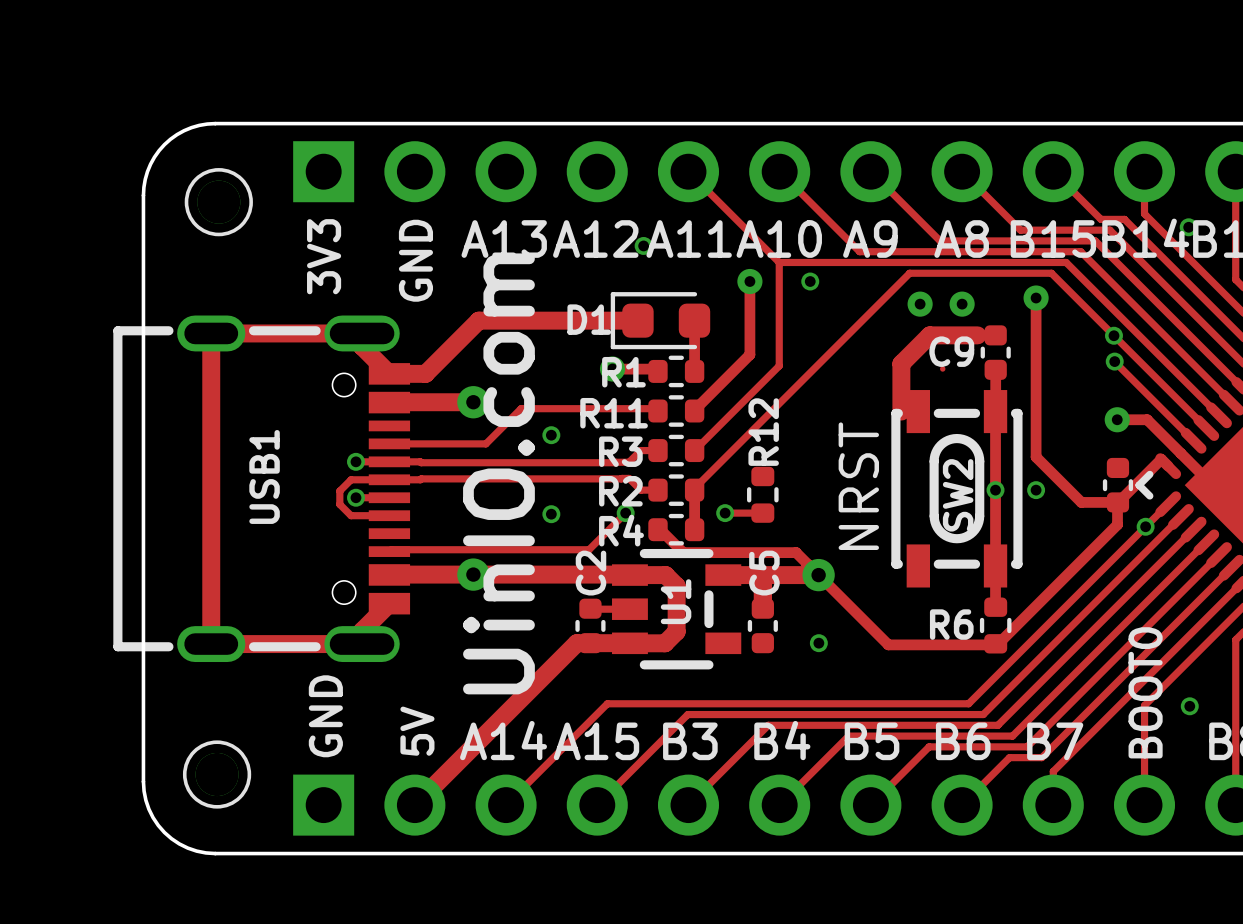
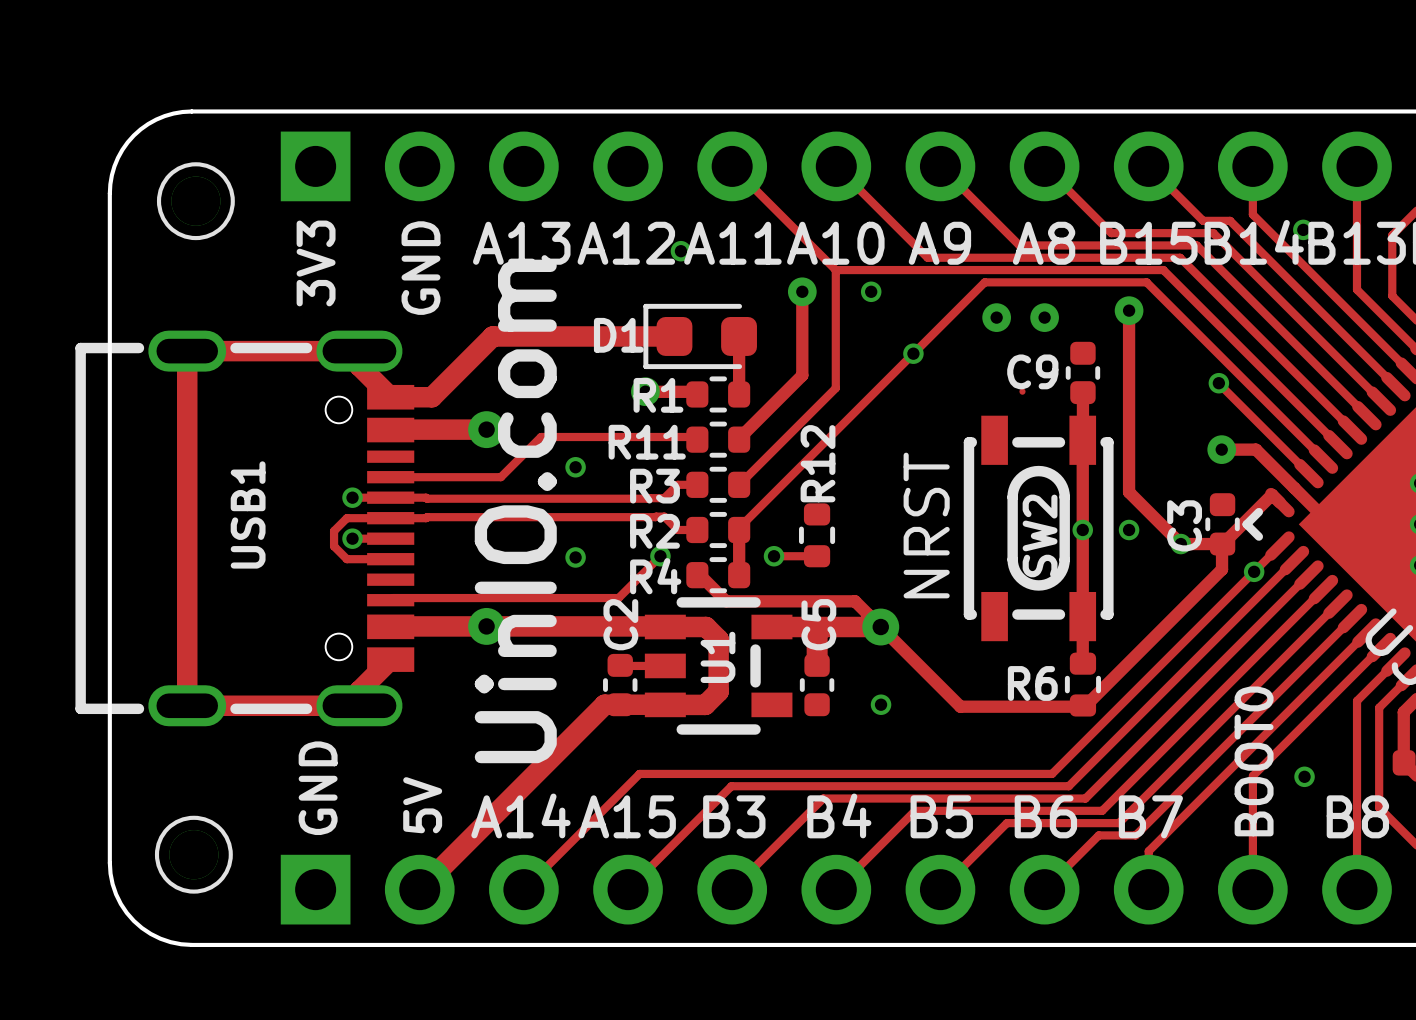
via: none -> (913, 353)
track: (977, 335) (929, 335) (901, 363) (901, 411) -> none
via: (1113, 335) -> none
C3 name: none -> C3 (1184, 525)
via: none -> (1180, 544)

